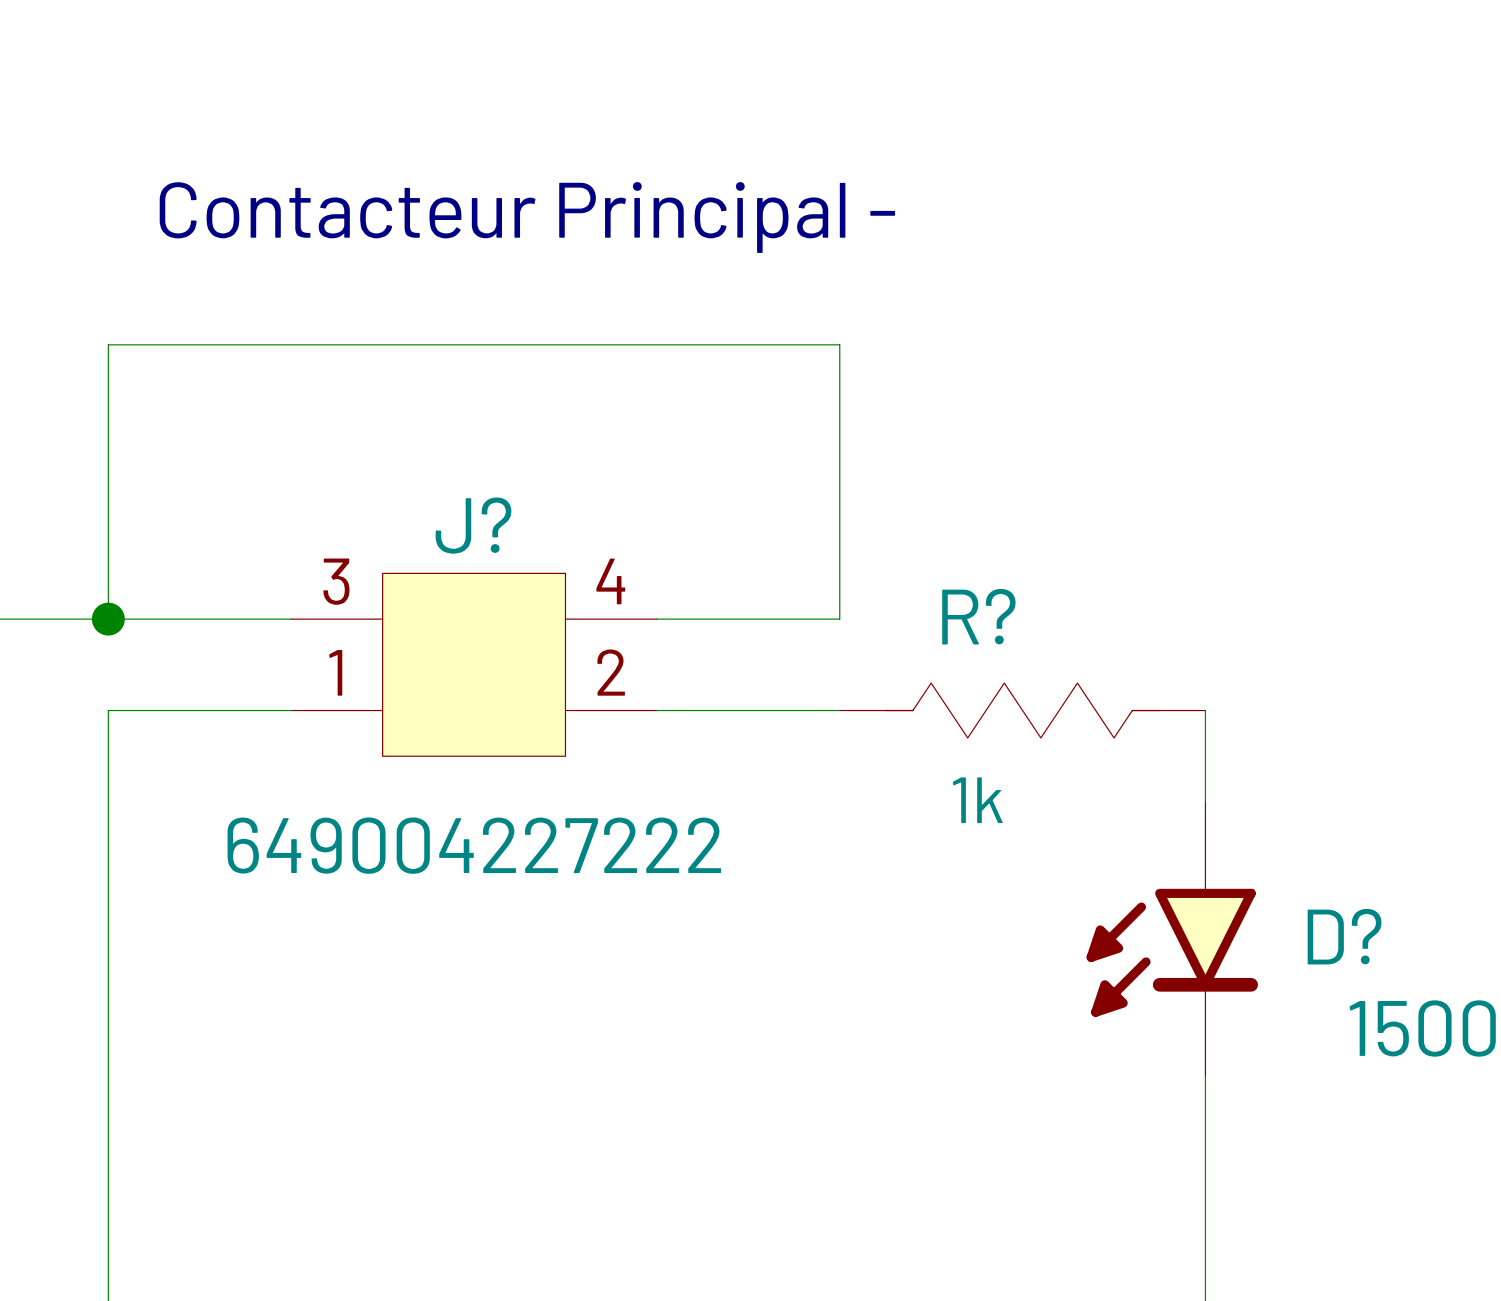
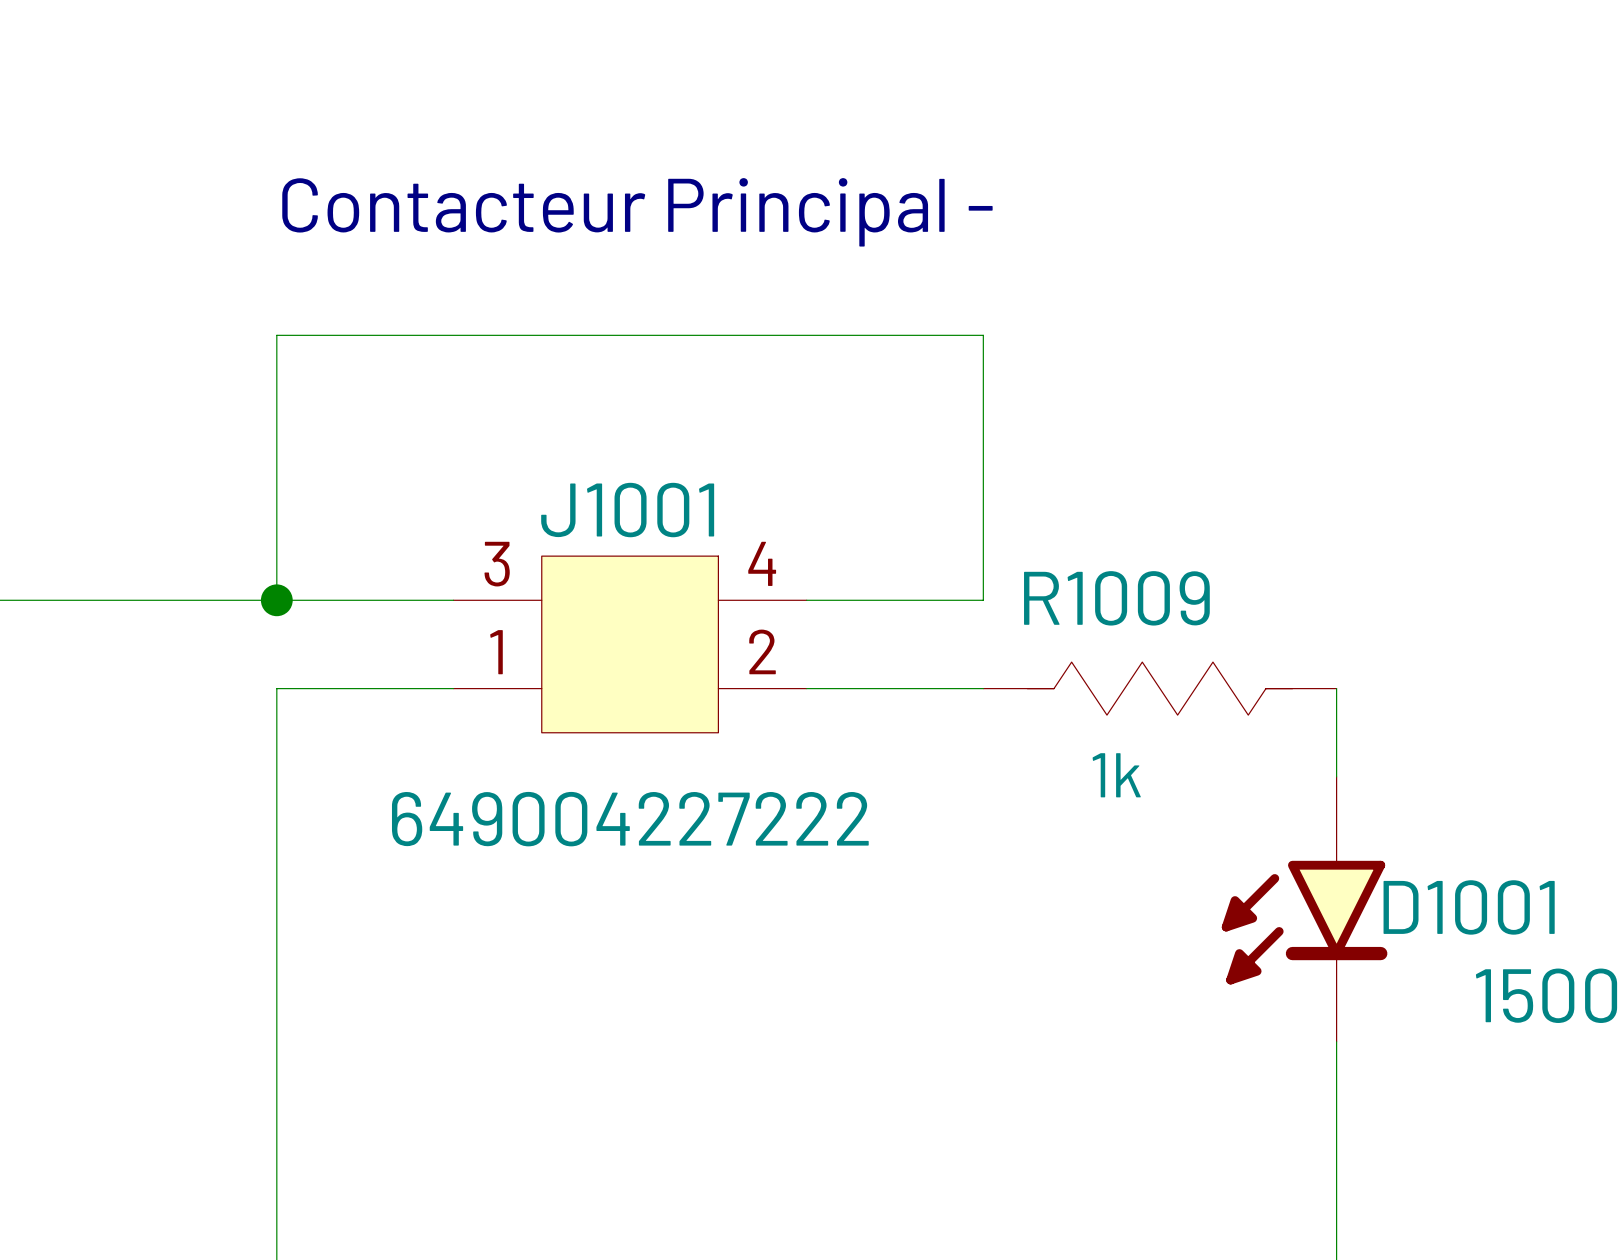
text position: Contacteur Principal - (527, 217) -> Contacteur Principal - (637, 212)
J? name: J? (473, 525) -> J1001 (627, 510)
R? name: R? (978, 616) -> R1009 (1116, 598)
D? name: D? (1344, 936) -> D1001 (1469, 907)

